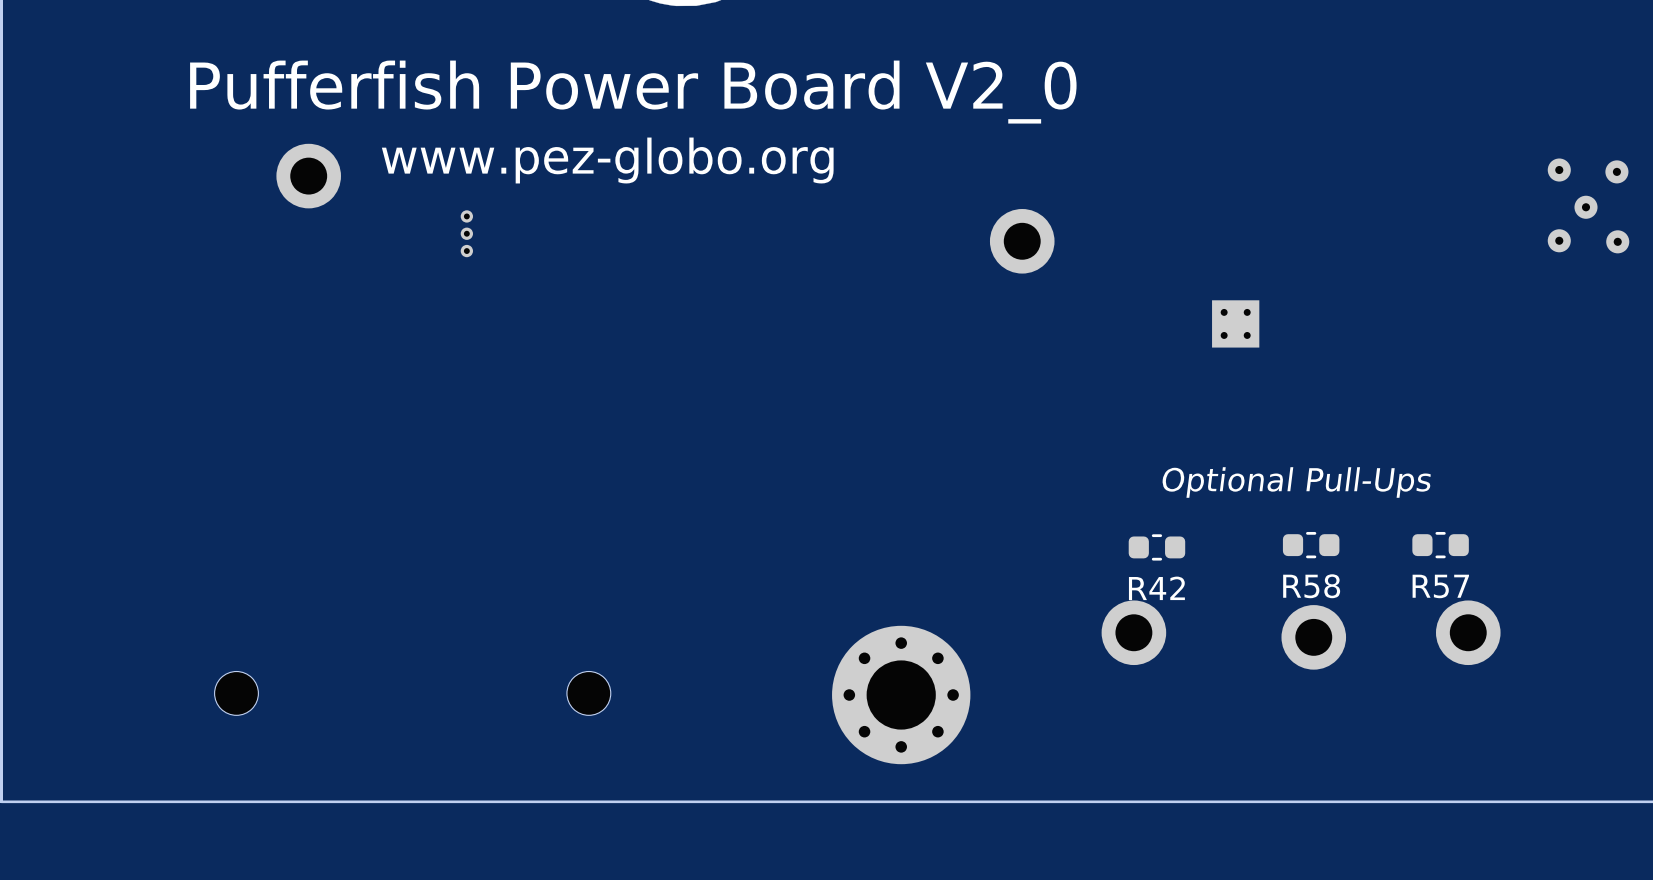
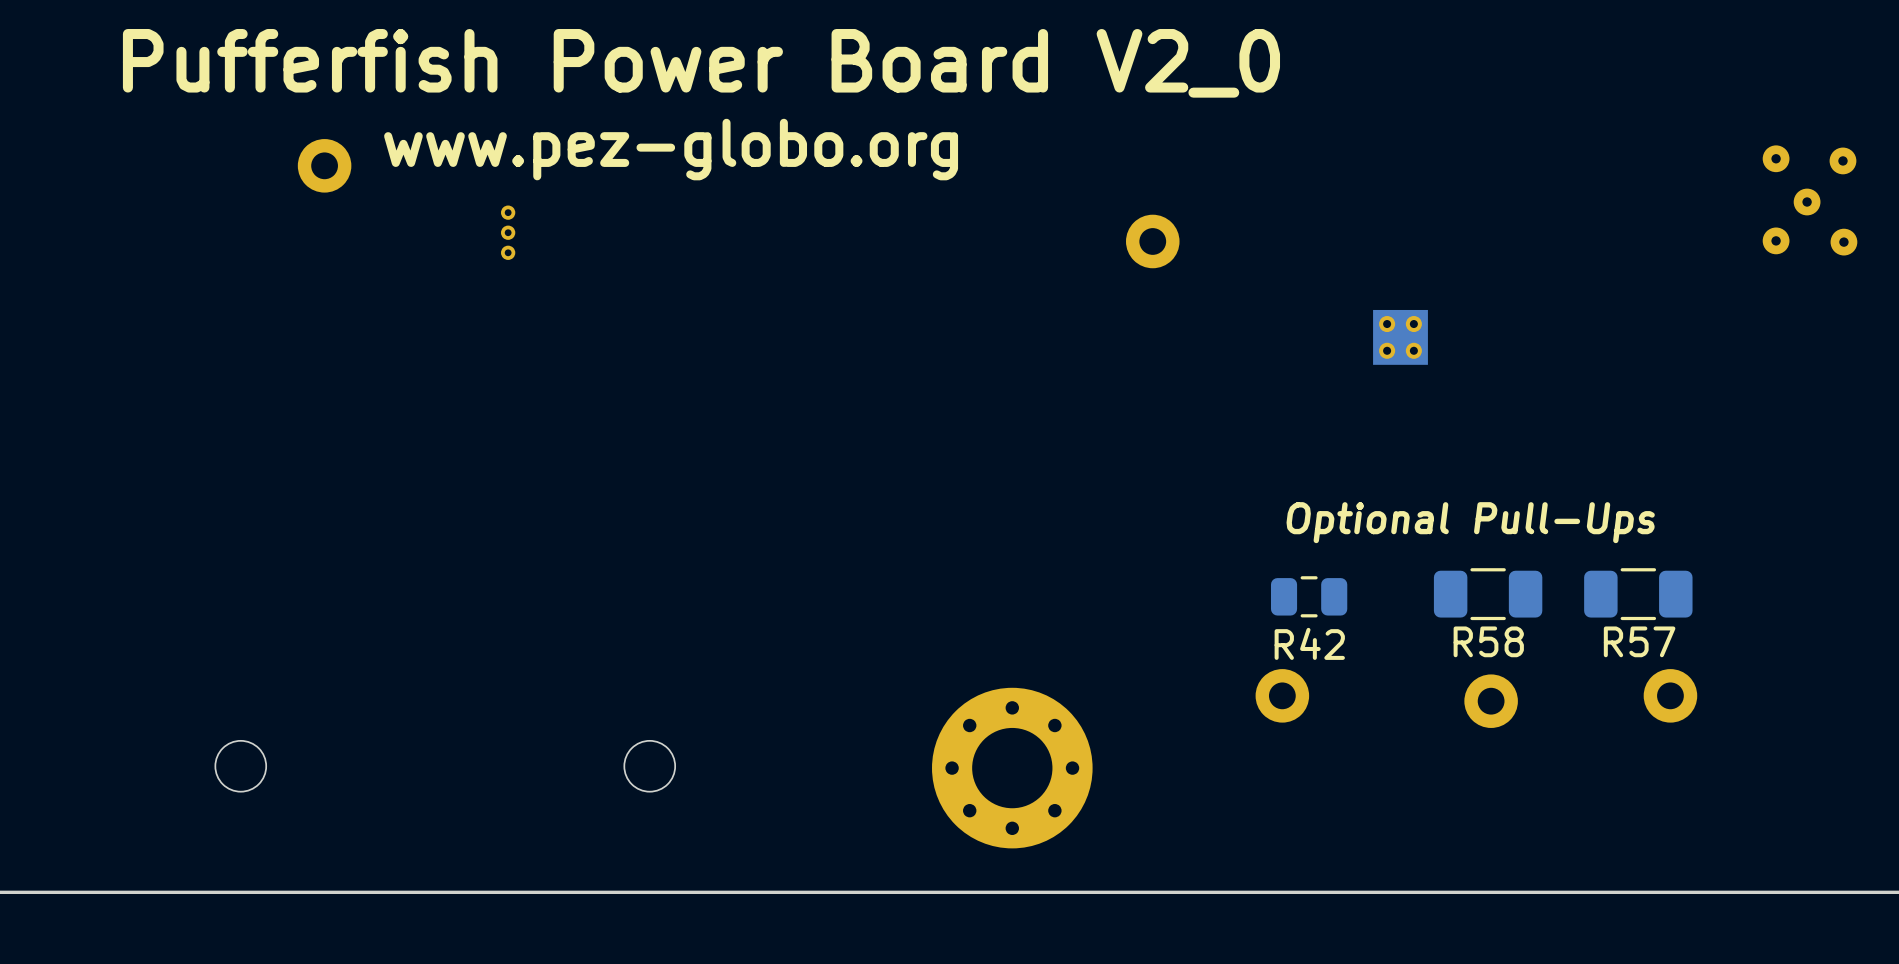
part footprint: [276, 143, 341, 209] -> [297, 139, 352, 193]
part footprint: [989, 209, 1055, 274] -> [1125, 214, 1180, 269]
R58 footprint: [1282, 531, 1340, 559] -> [1433, 568, 1543, 621]
R57 footprint: [1412, 531, 1469, 559] -> [1584, 568, 1693, 621]
R42 footprint: [1128, 534, 1186, 561] -> [1270, 576, 1348, 618]
part footprint: [1101, 600, 1167, 666] -> [1255, 669, 1310, 723]
part footprint: [1435, 600, 1501, 666] -> [1643, 669, 1698, 723]
part footprint: [1281, 605, 1347, 670] -> [1464, 674, 1518, 728]

